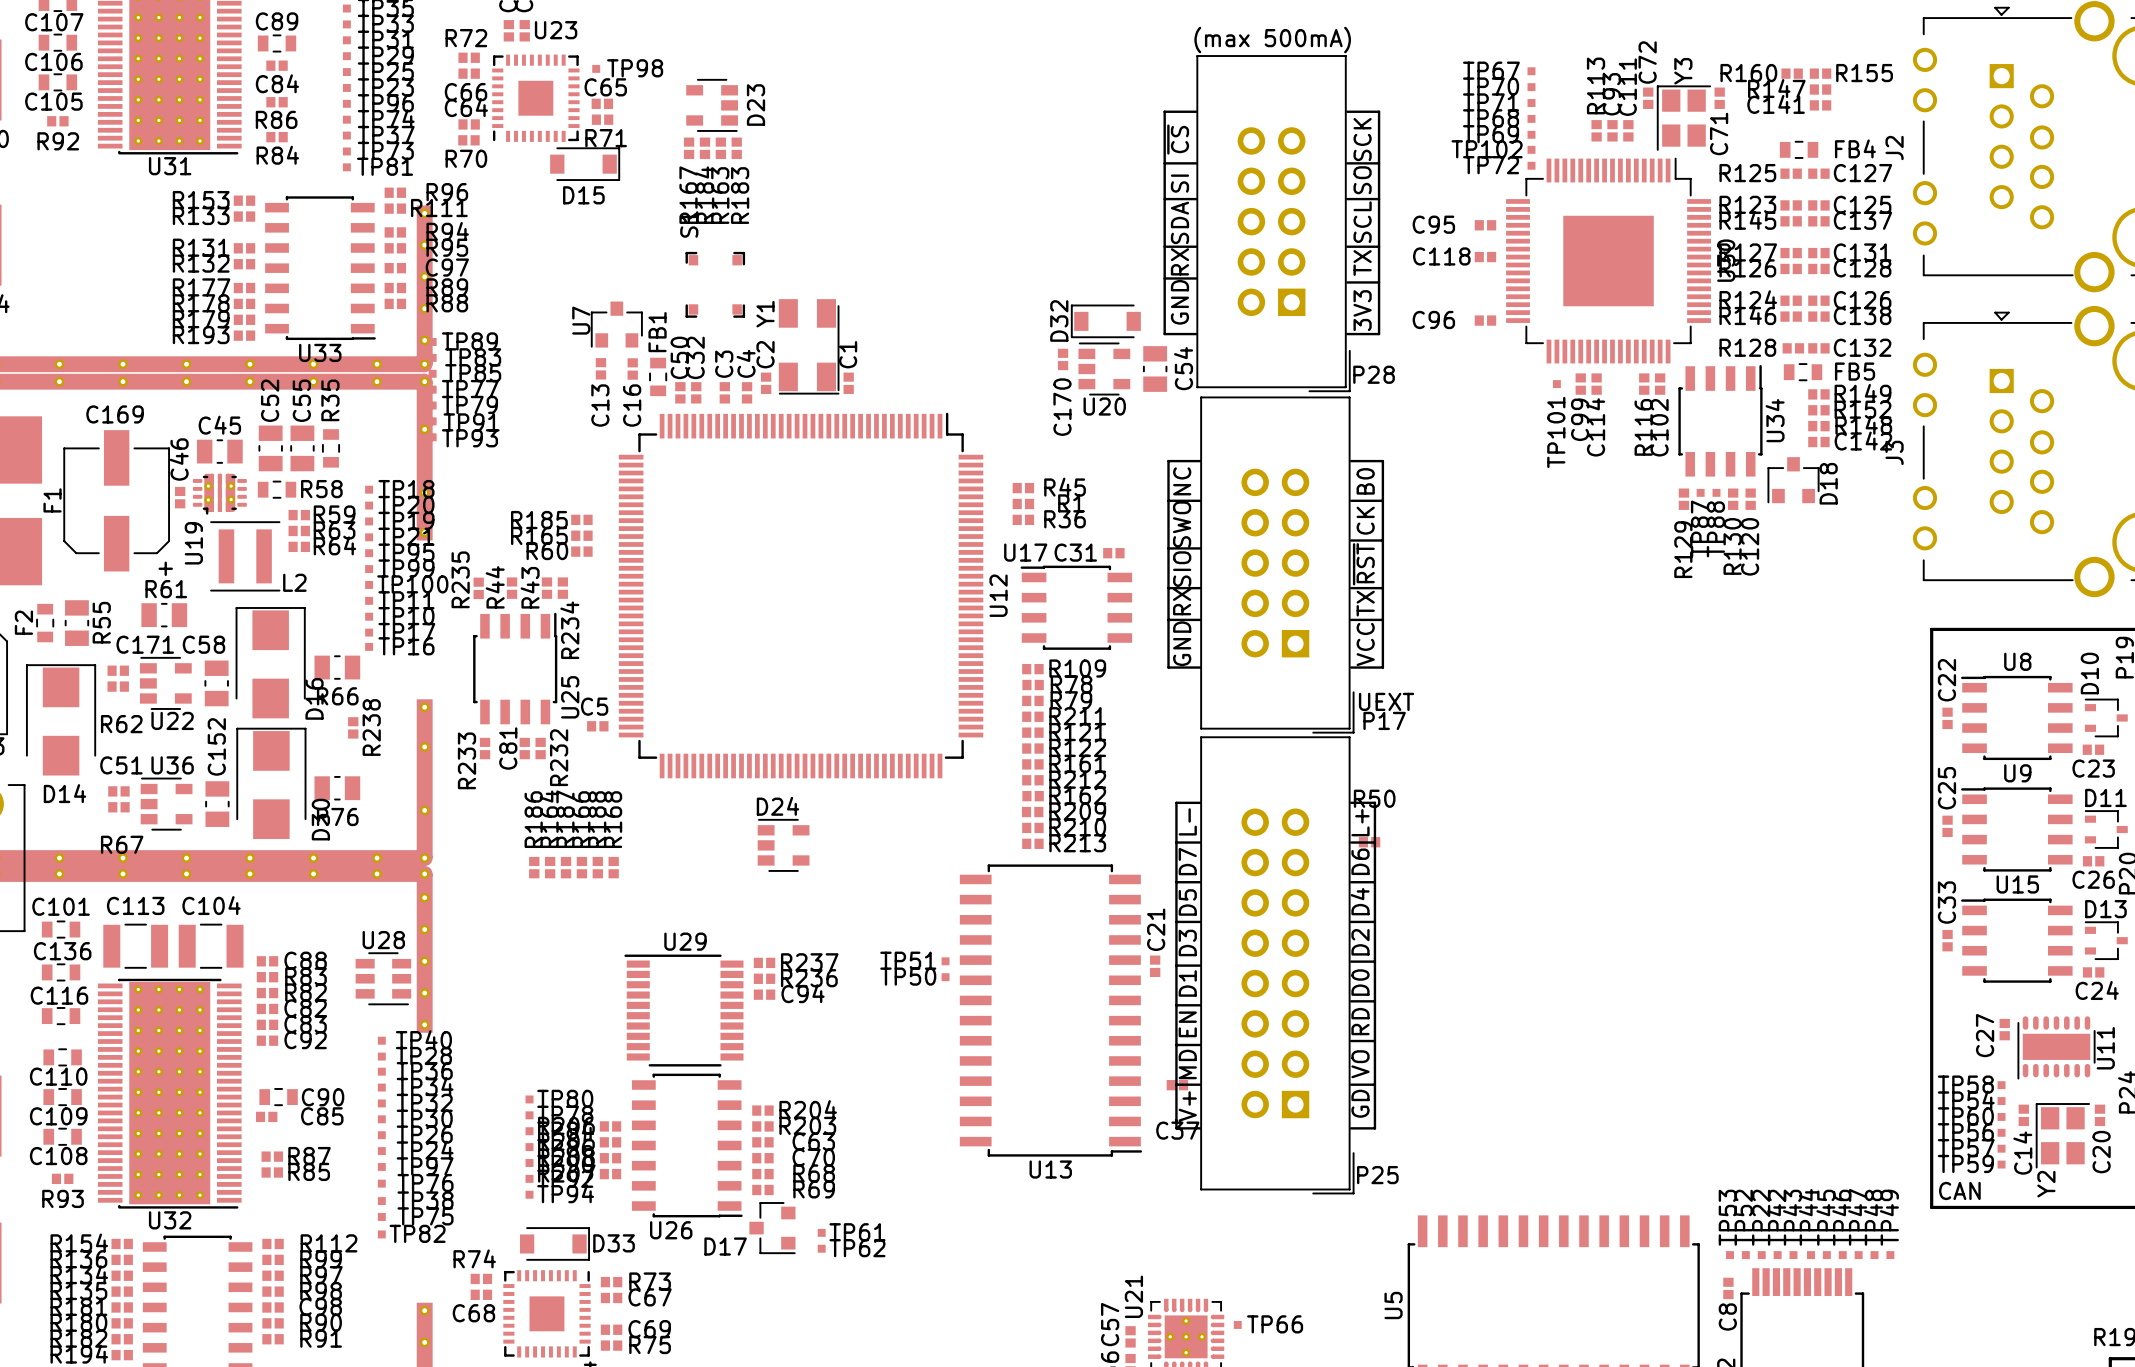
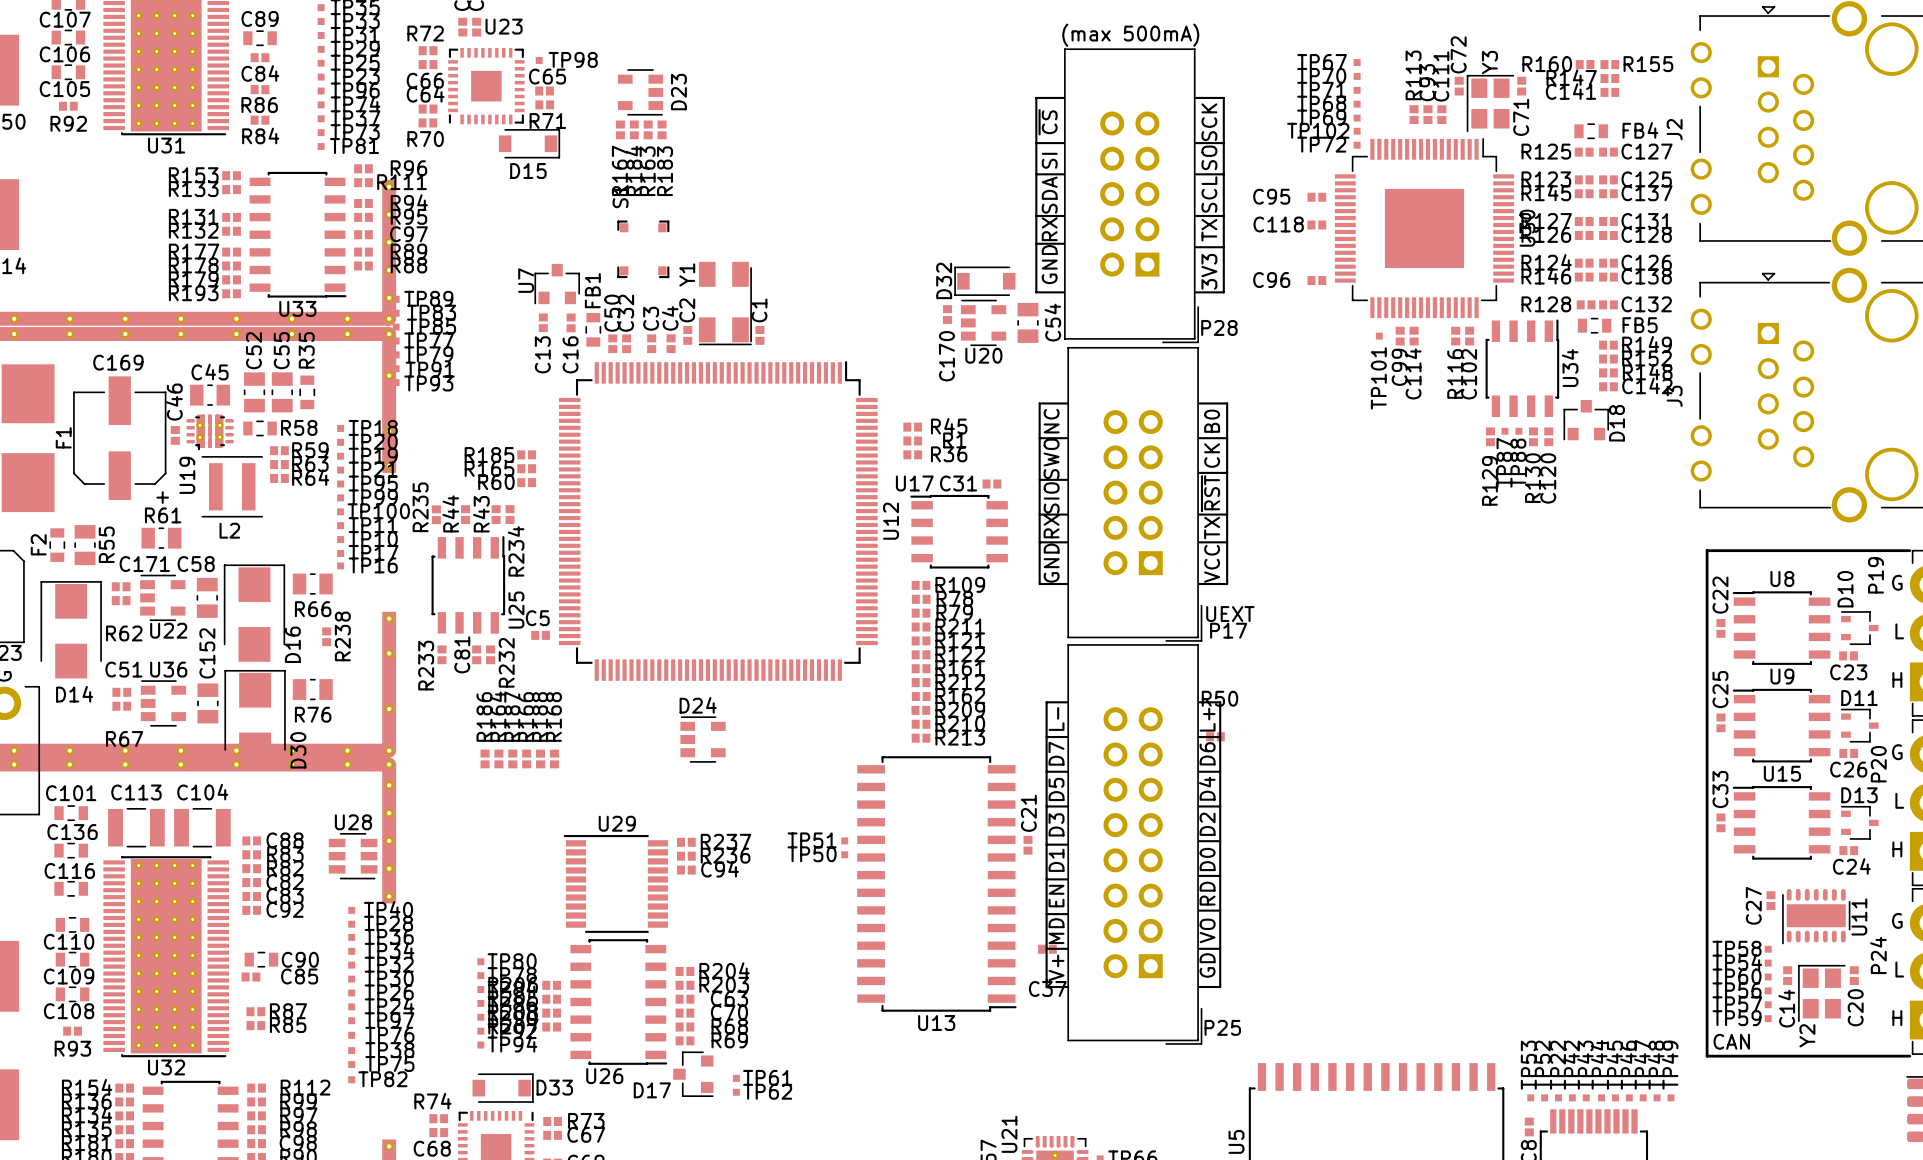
L2 name position: L2 (294, 582) -> L2 (229, 530)
D16 position: (270, 662) -> (254, 613)
D30 position: (271, 783) -> (255, 718)

